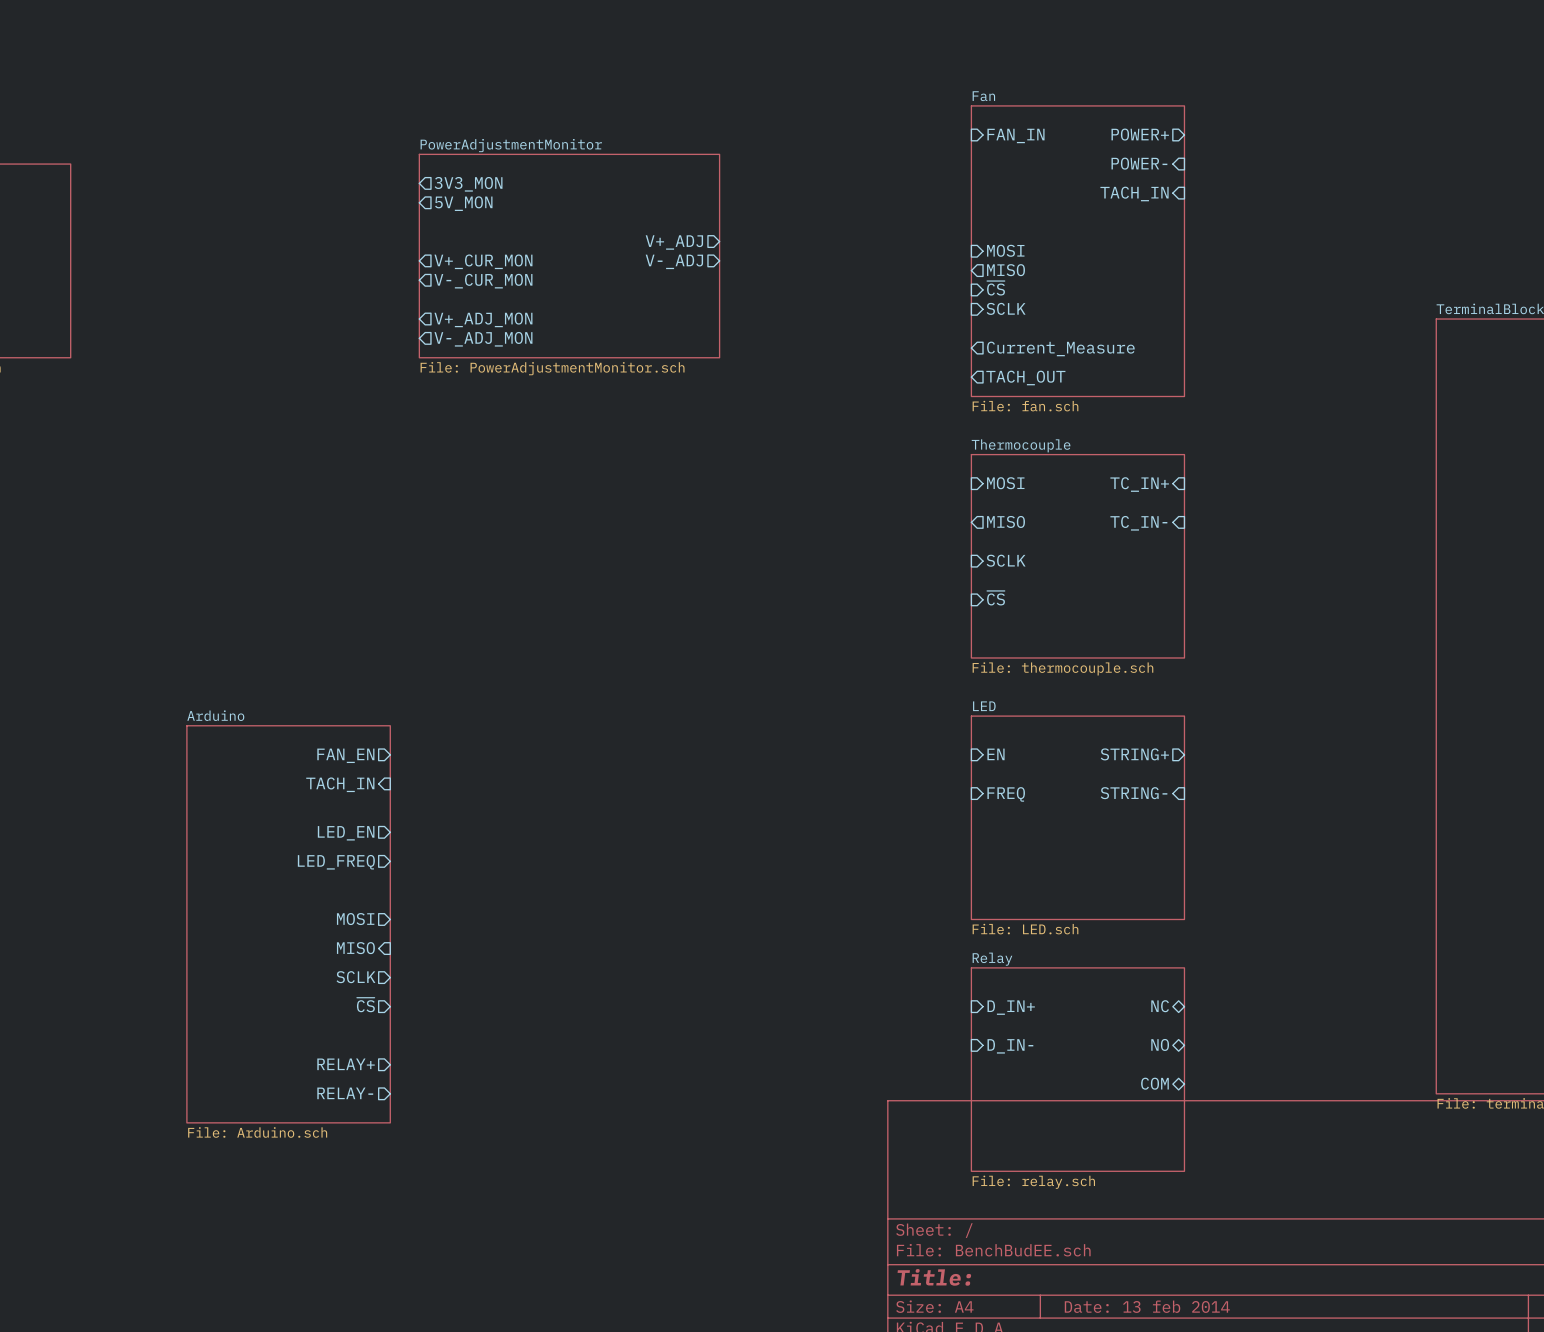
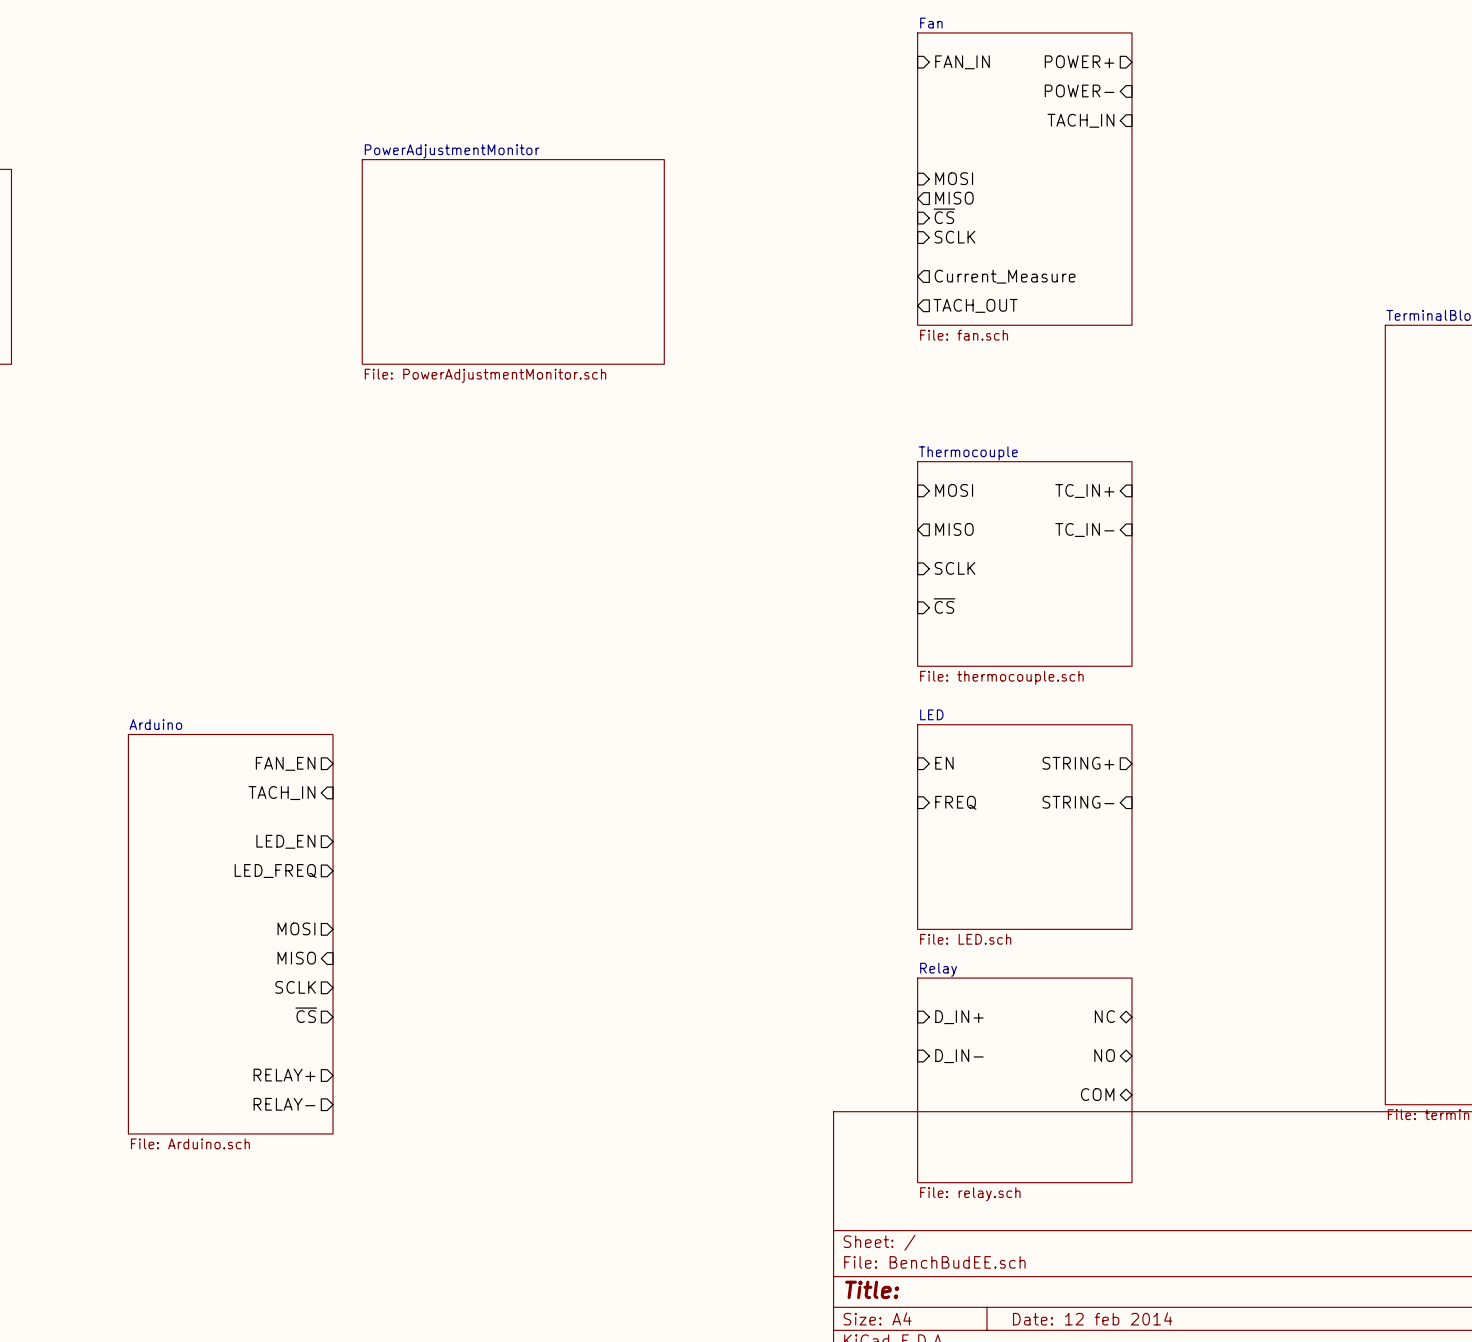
sheet pin position: POWER+ (1140, 134) -> POWER+ (1079, 61)
sheet pin position: FAN_IN (1015, 135) -> FAN_IN (962, 62)
sheet pin position: POWER- (1139, 163) -> POWER- (1079, 90)
sheet pin: 3V3_MON (468, 184) -> none
sheet pin: none -> MISO (954, 198)
sheet pin position: TACH_IN (1134, 193) -> TACH_IN (1080, 120)
sheet pin: 5V_MON (463, 203) -> none
sheet pin: V+_ADJ (674, 242) -> none
sheet pin position: MOSI (1005, 250) -> MOSI (954, 178)
sheet Fan position: (1077, 251) -> (1024, 179)
sheet pin: V+_CUR_MON (483, 261) -> none
sheet pin: V-_ADJ (674, 261) -> none
sheet pin: MISO (1006, 270) -> Current_Measure (1005, 276)
sheet pin: V-_CUR_MON (483, 281) -> none
sheet pin position: ~{CS} (996, 288) -> ~{CS} (944, 216)
sheet pin position: SCLK (1006, 308) -> SCLK (955, 237)
sheet pin: V+_ADJ_MON (483, 319) -> none
sheet pin: V-_ADJ_MON (483, 339) -> none
sheet pin: Current_Measure (1060, 348) -> none
sheet pin position: TACH_OUT (1025, 377) -> TACH_OUT (975, 305)
title block: Date: 13 feb 2014 (1147, 1306) -> Date: 12 feb 2014 (1092, 1318)

